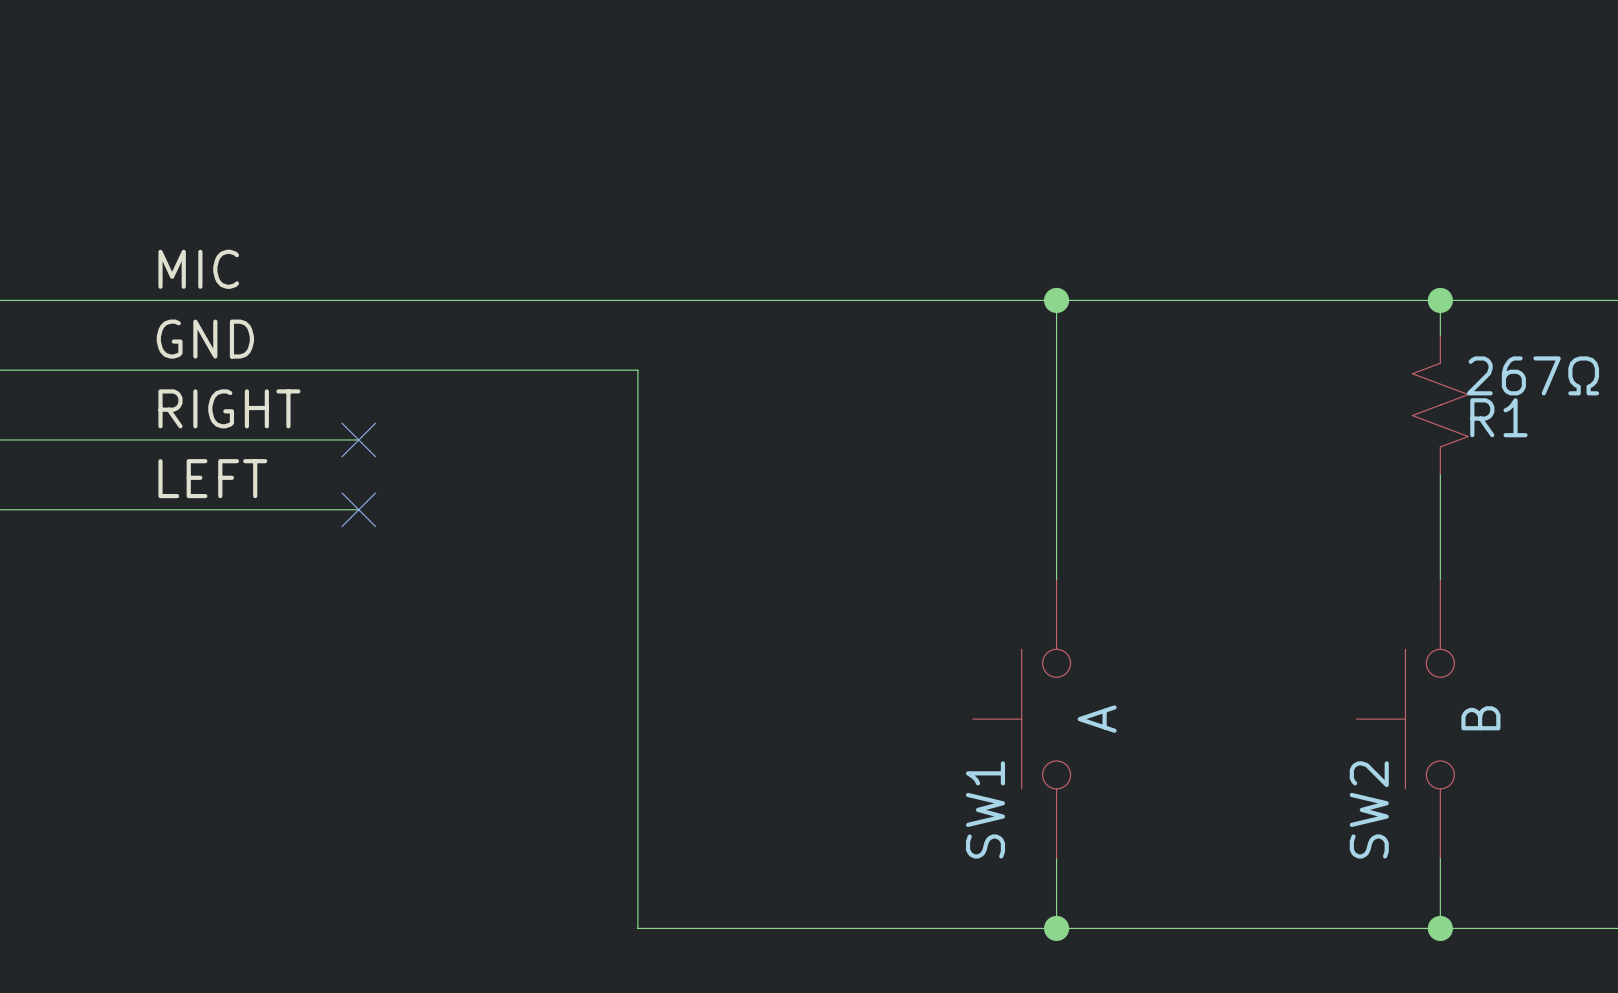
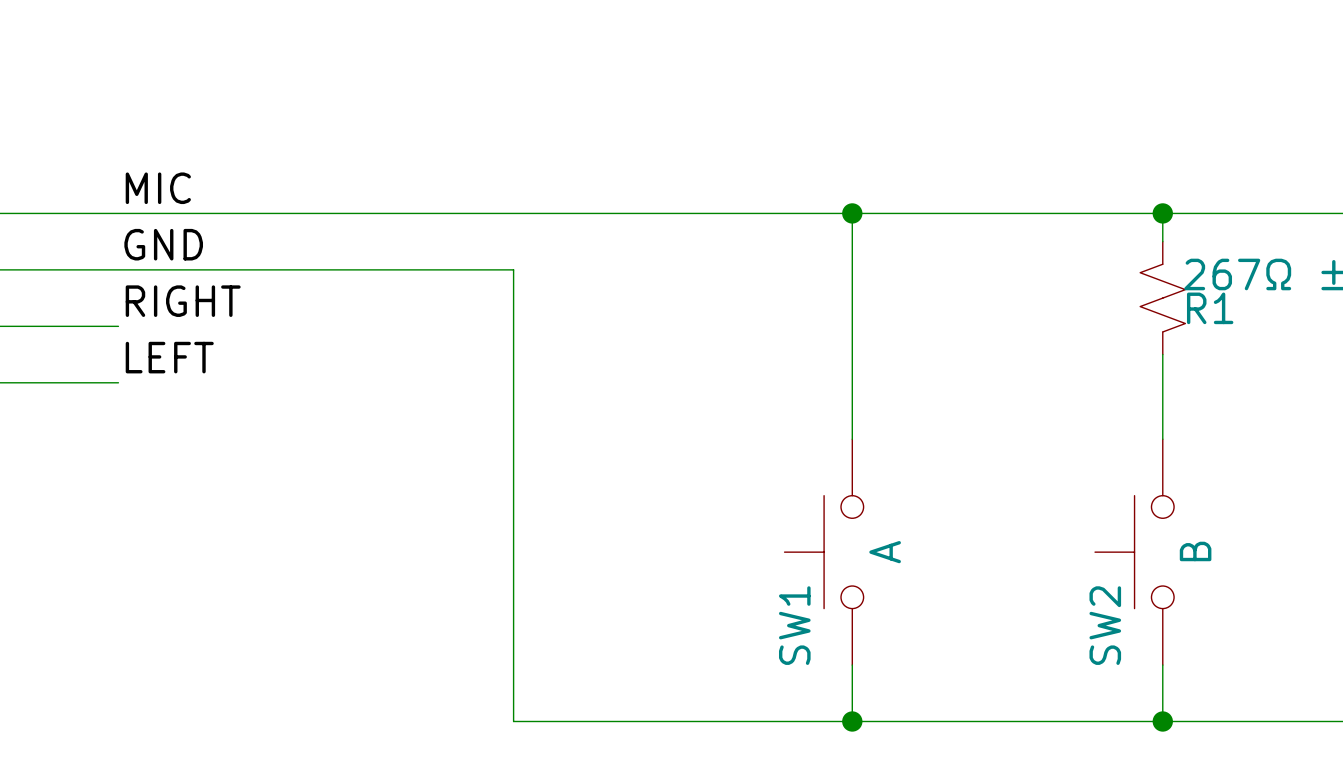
wire: (149, 439) (358, 439) -> none
no-connect mark: (358, 439) -> none
wire: (149, 509) (358, 509) -> none
no-connect mark: (358, 509) -> none

